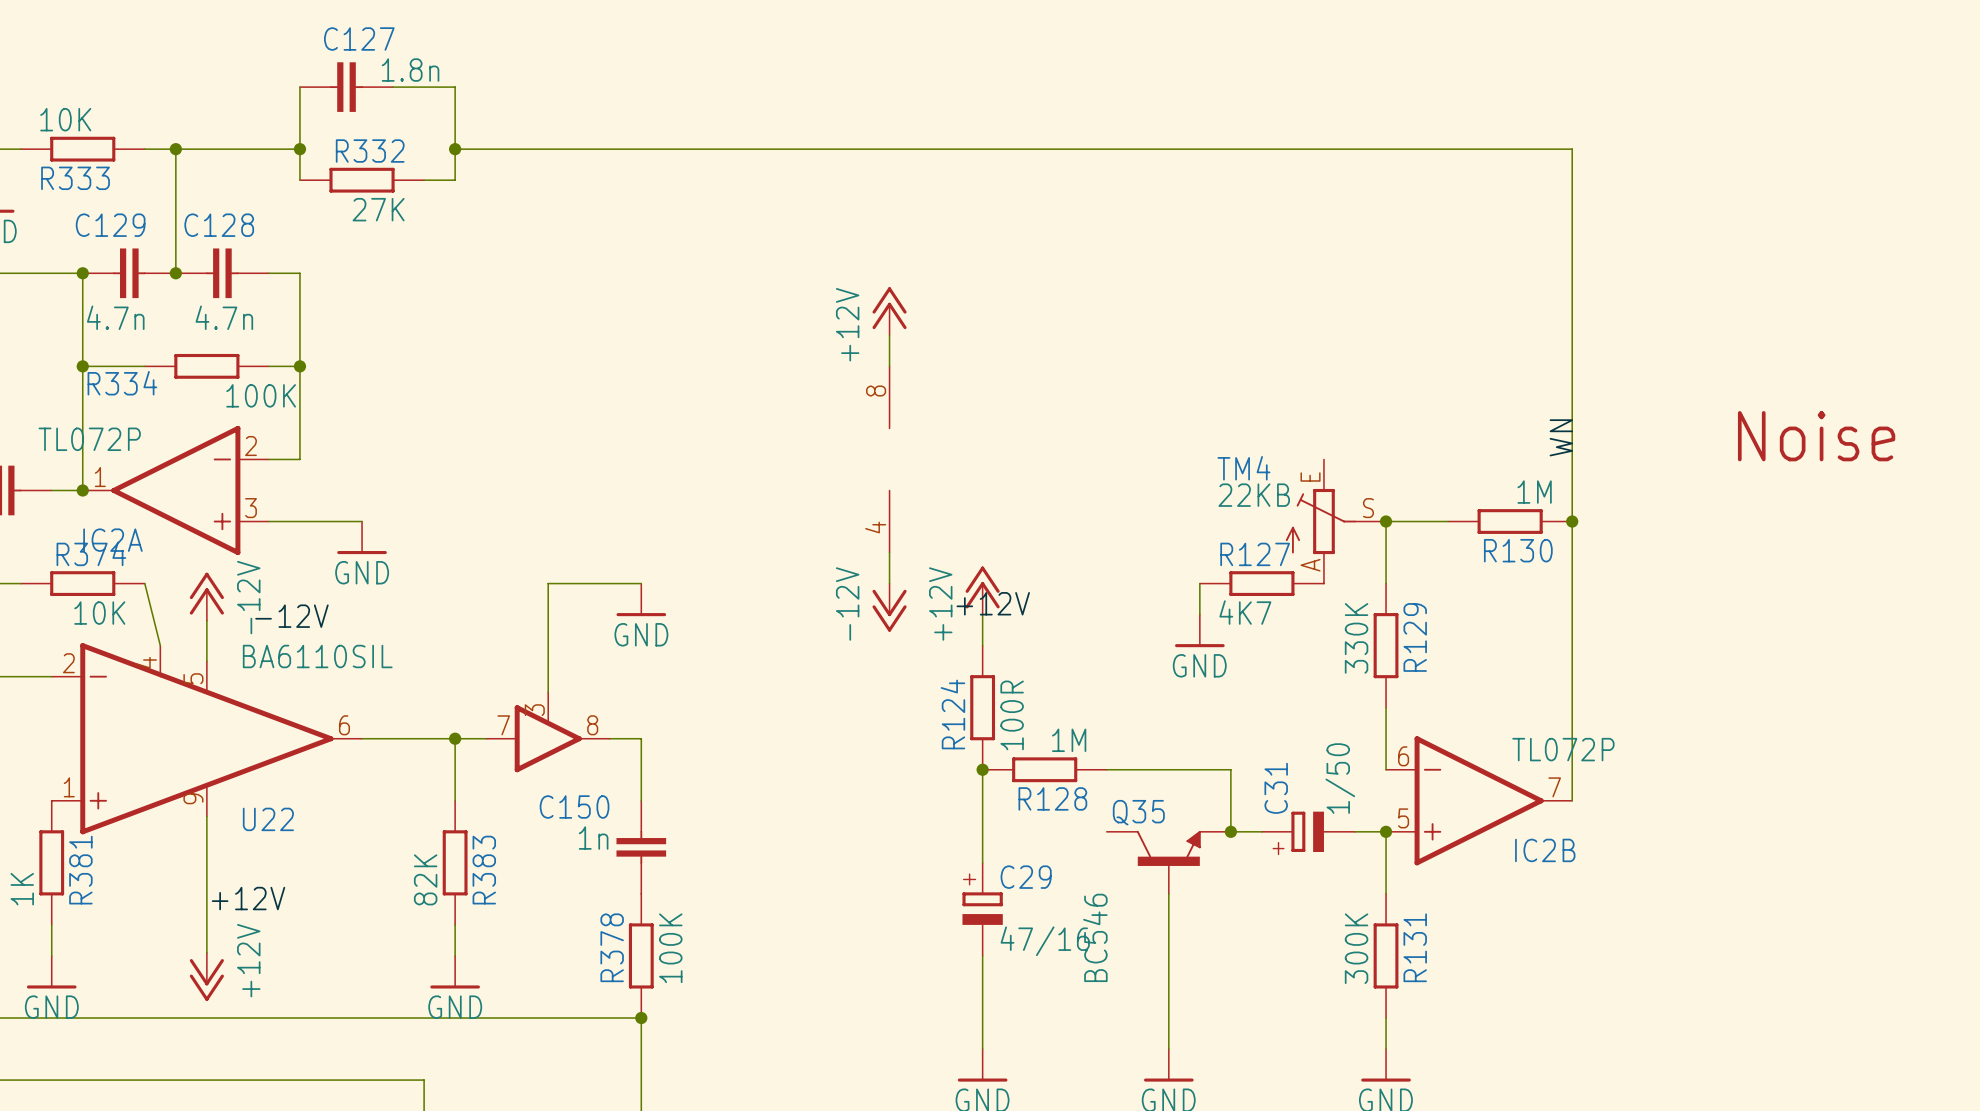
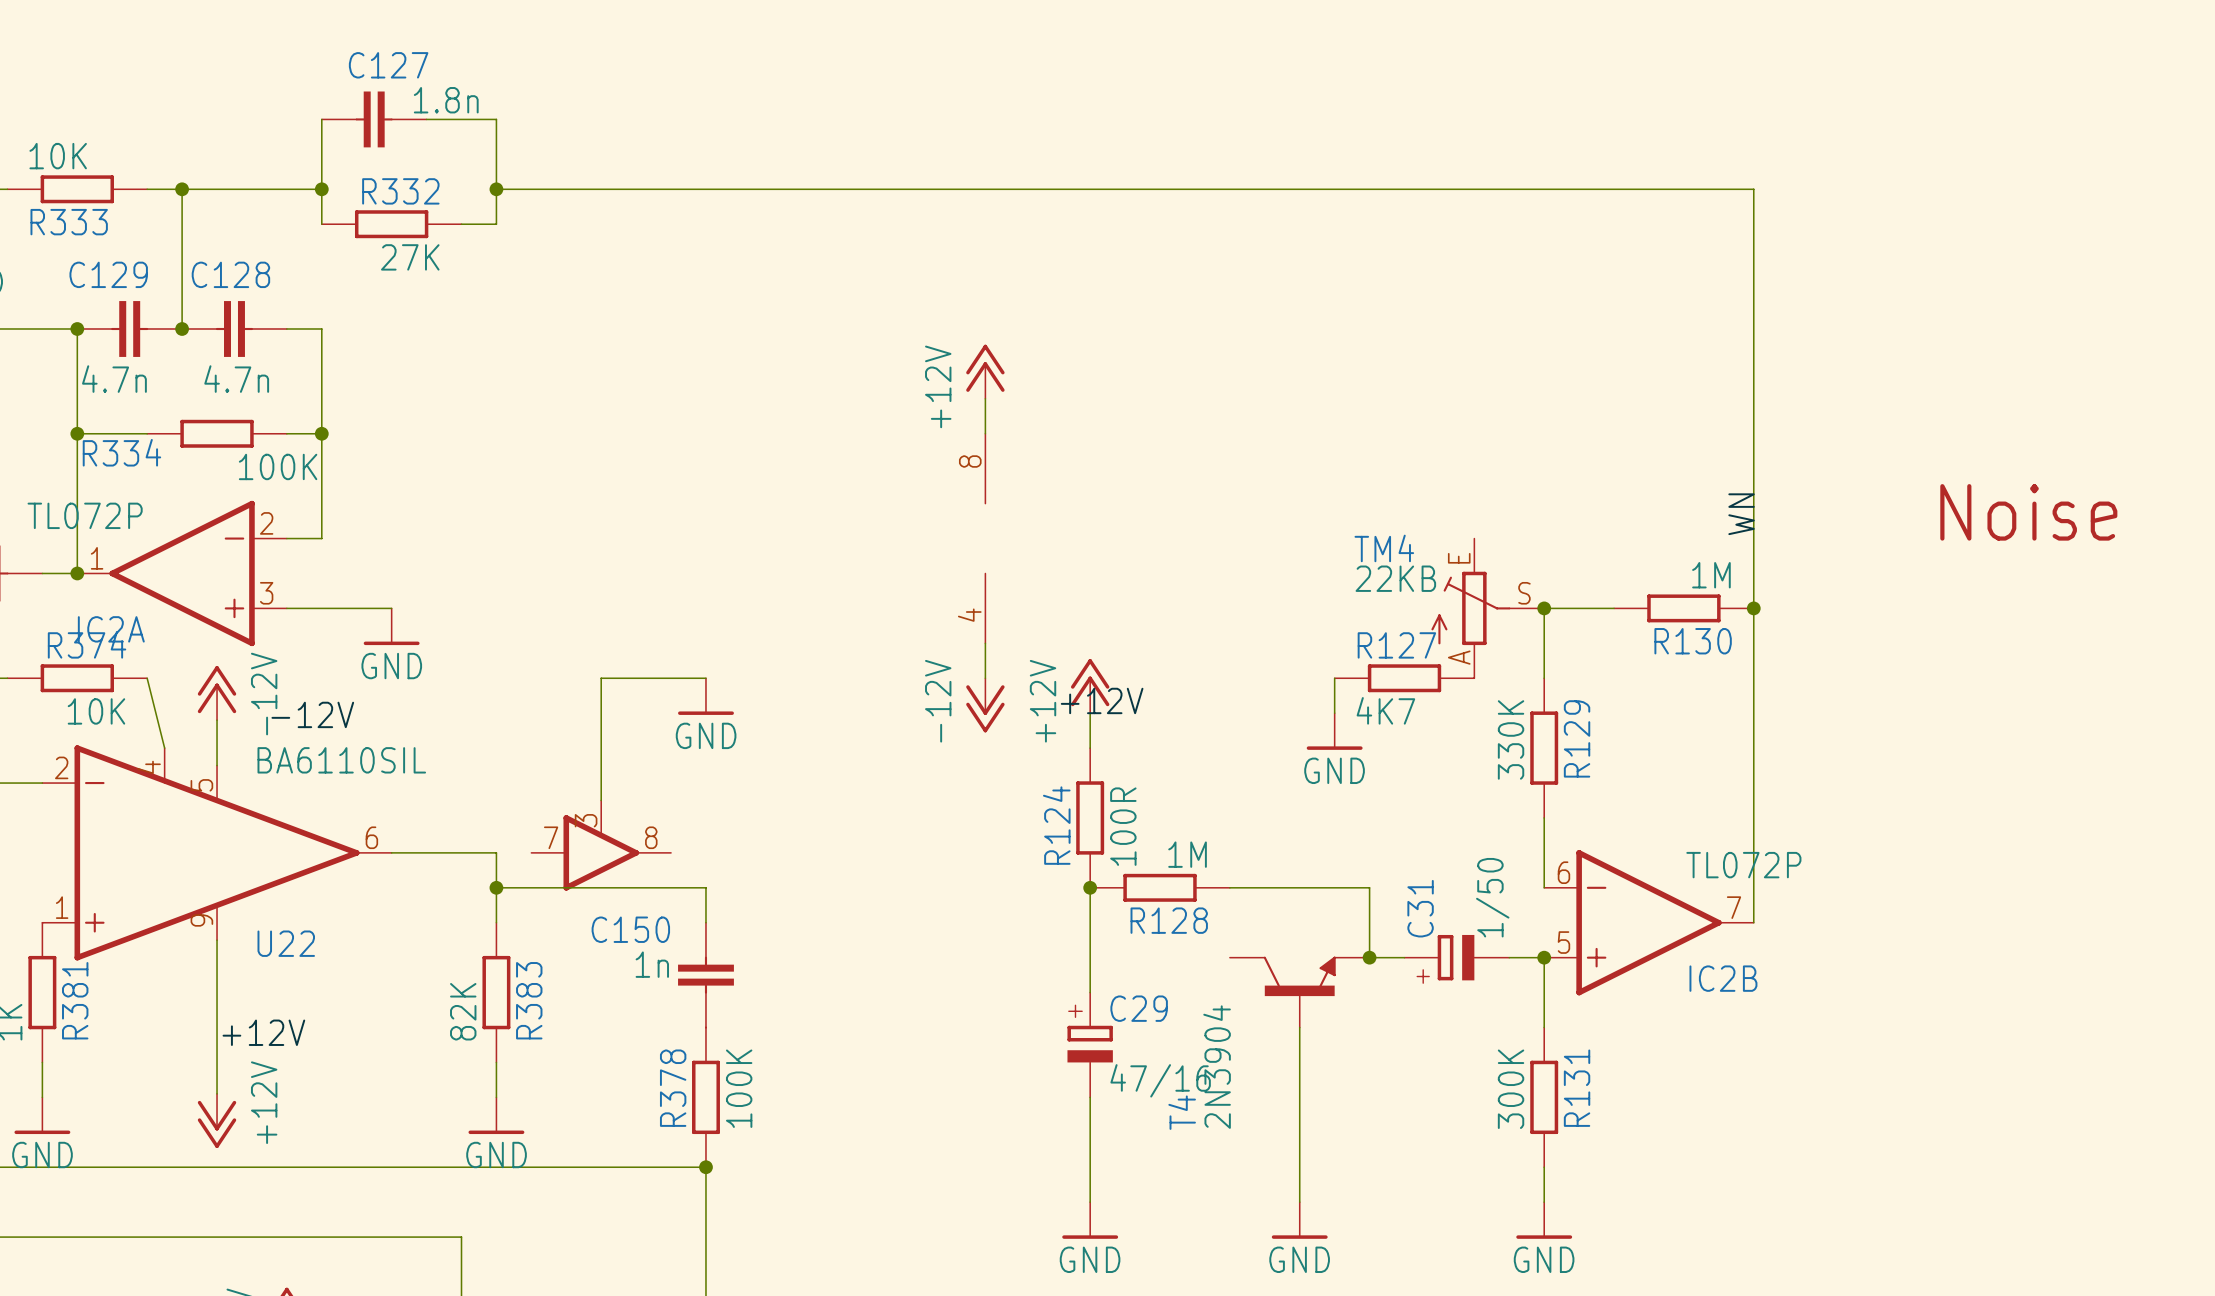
wire: (455, 738) (486, 738) -> none
junction position: (455, 738) -> (496, 887)
wire: (610, 738) (641, 738) (641, 769) -> (496, 887) (705, 887)
Q35 name: Q35 (1138, 812) -> T4 (1182, 1112)
Q35 value: BC546 (1095, 937) -> 2N3904 (1217, 1067)

